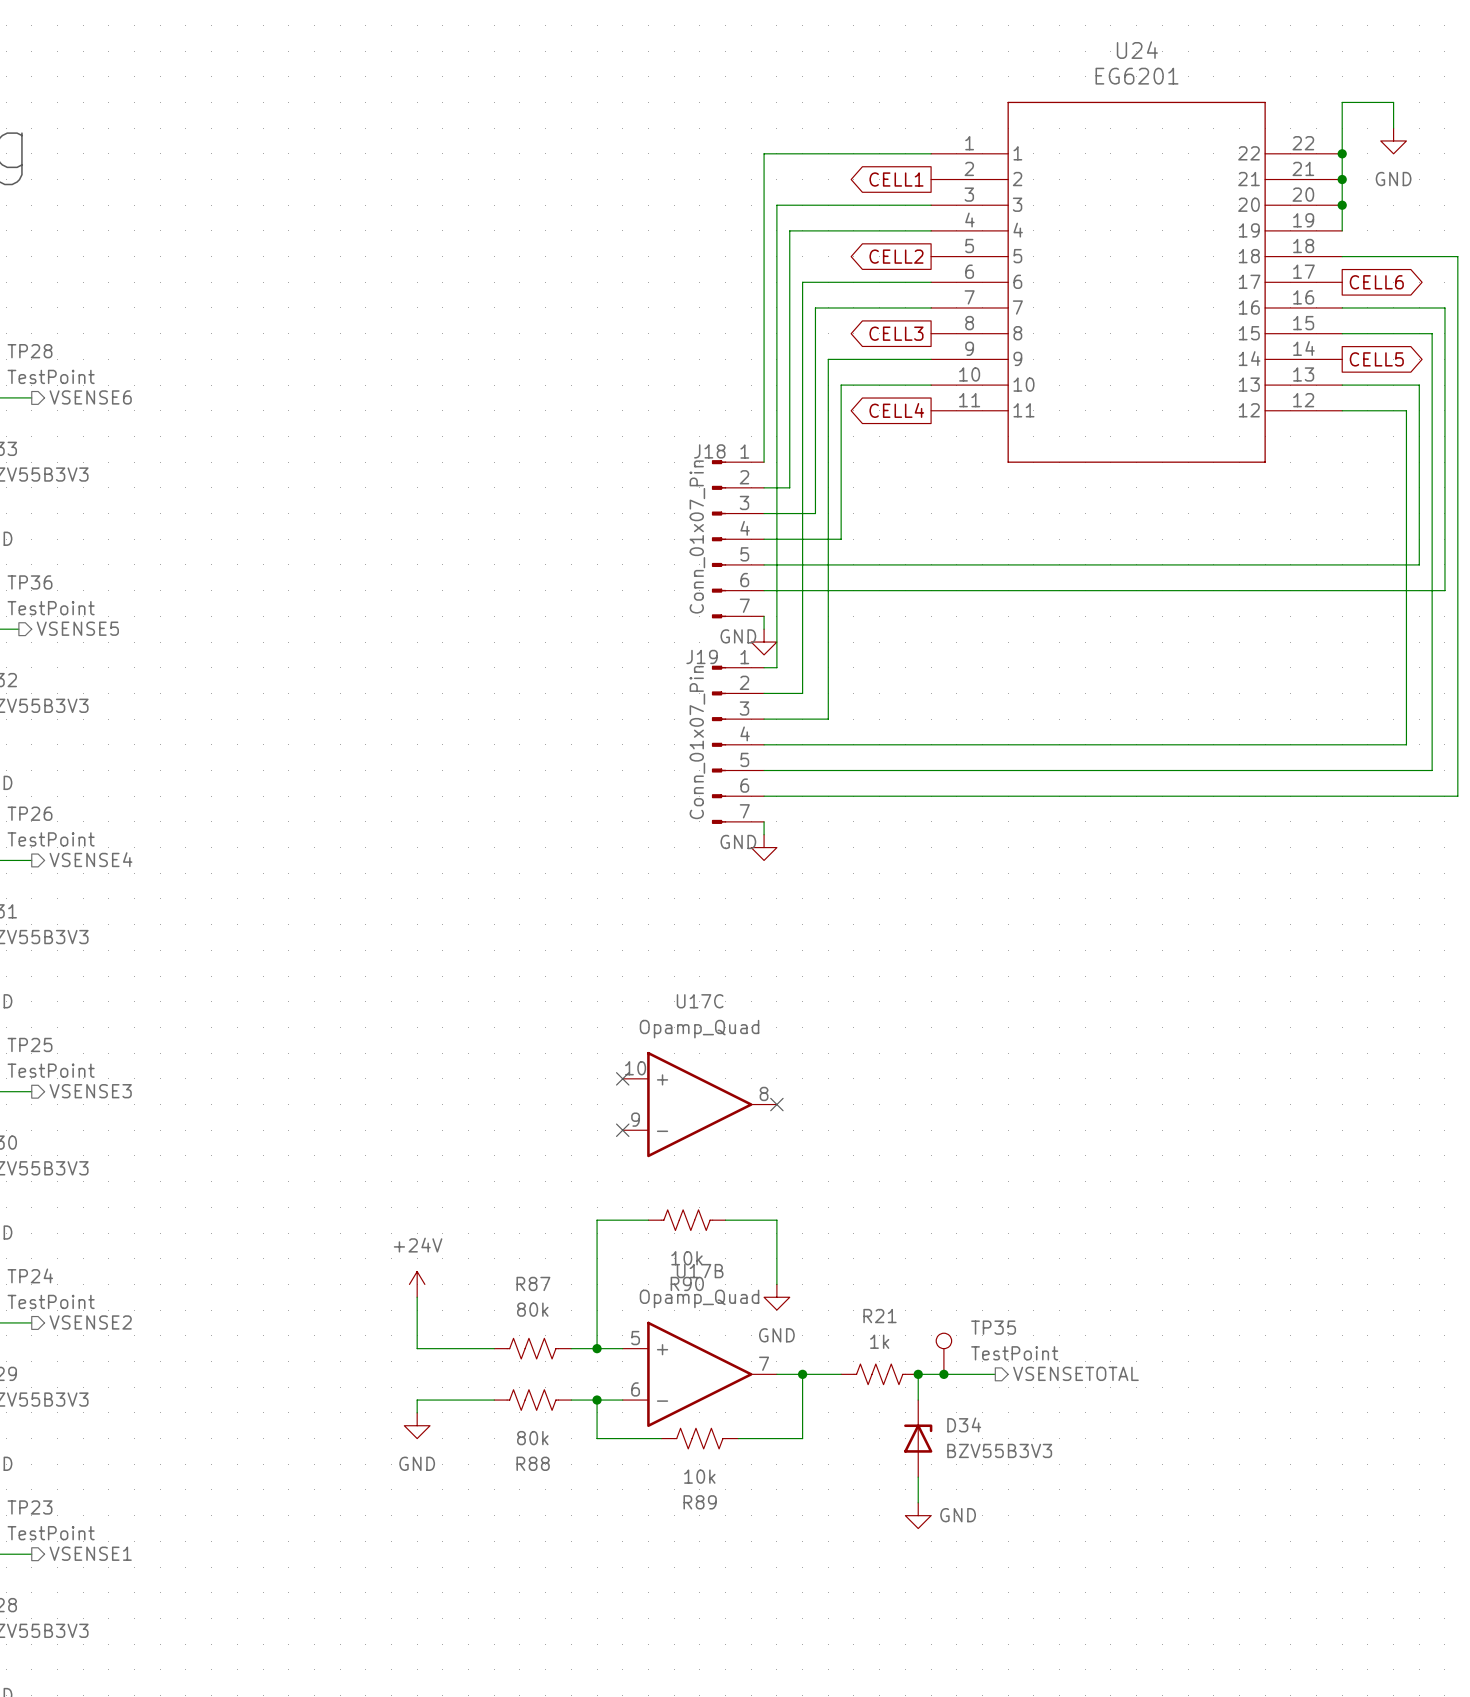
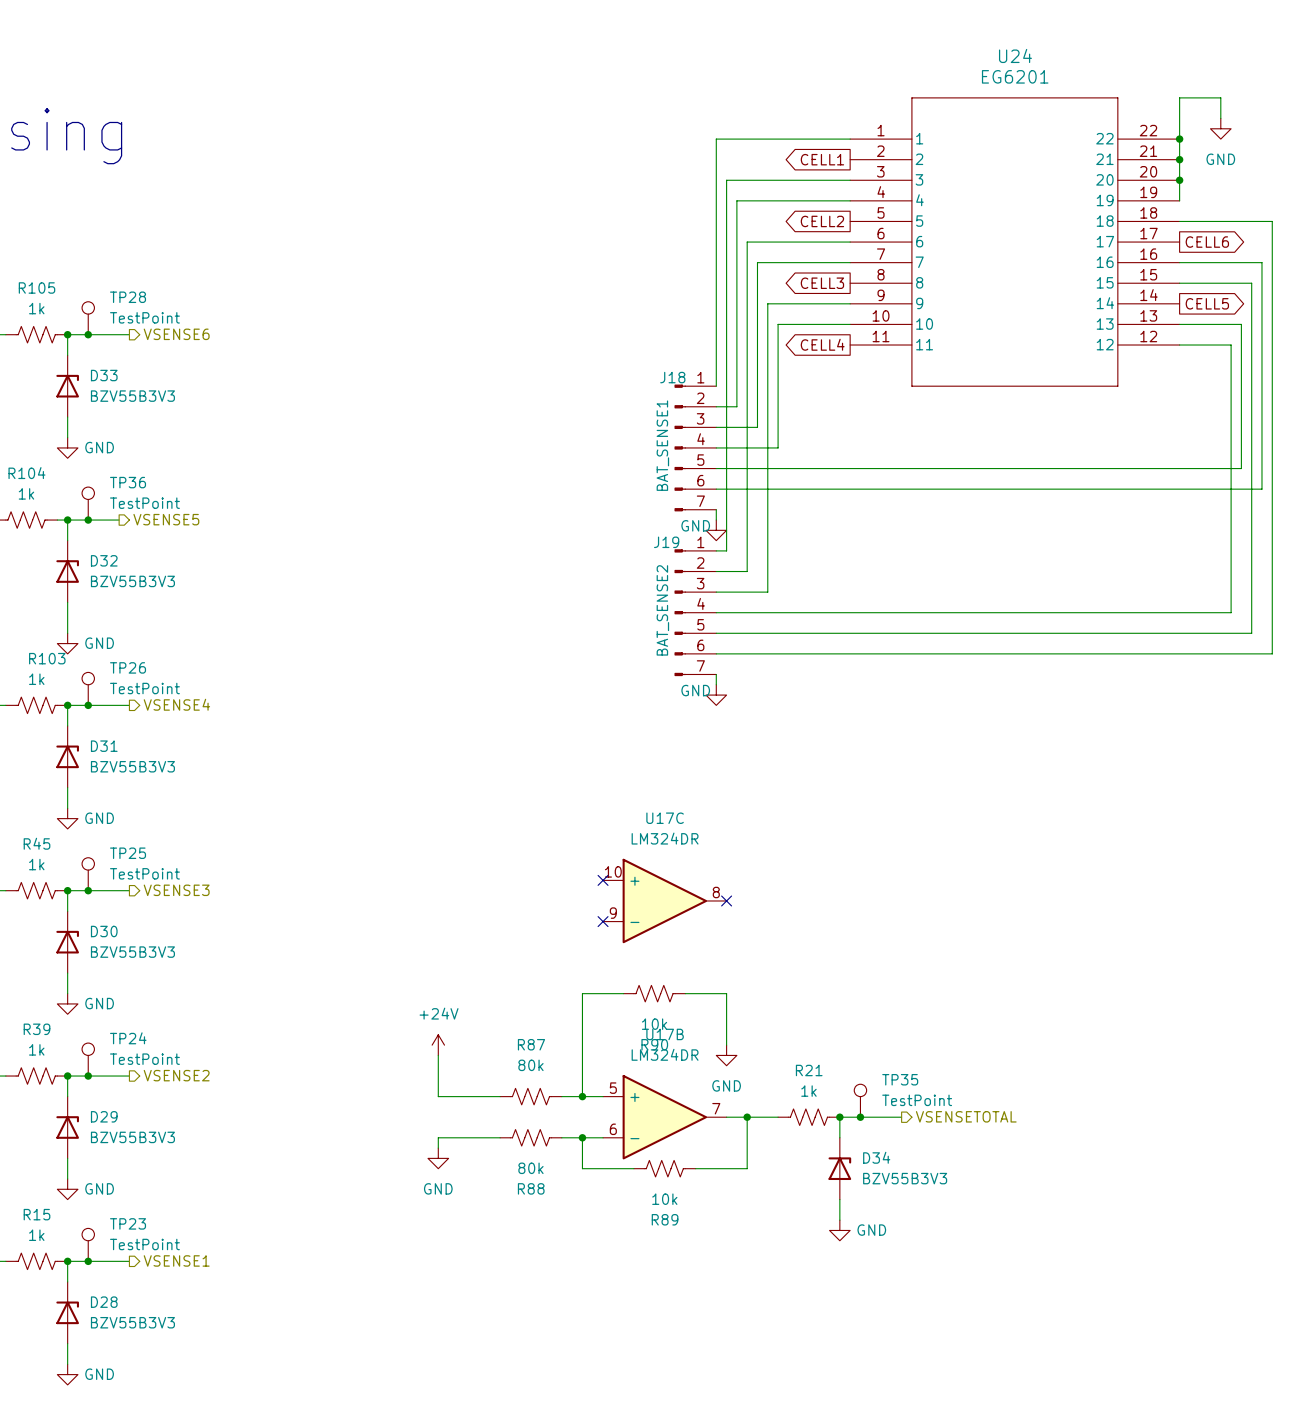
J18 value: Conn_01x07_Pin (697, 536) -> BAT_SENSE1 (662, 445)
J19 value: Conn_01x07_Pin (697, 742) -> BAT_SENSE2 (662, 610)
U17C value: Opamp_Quad (699, 1029) -> LM324DR (665, 838)
U17B value: Opamp_Quad (699, 1298) -> LM324DR (665, 1054)

